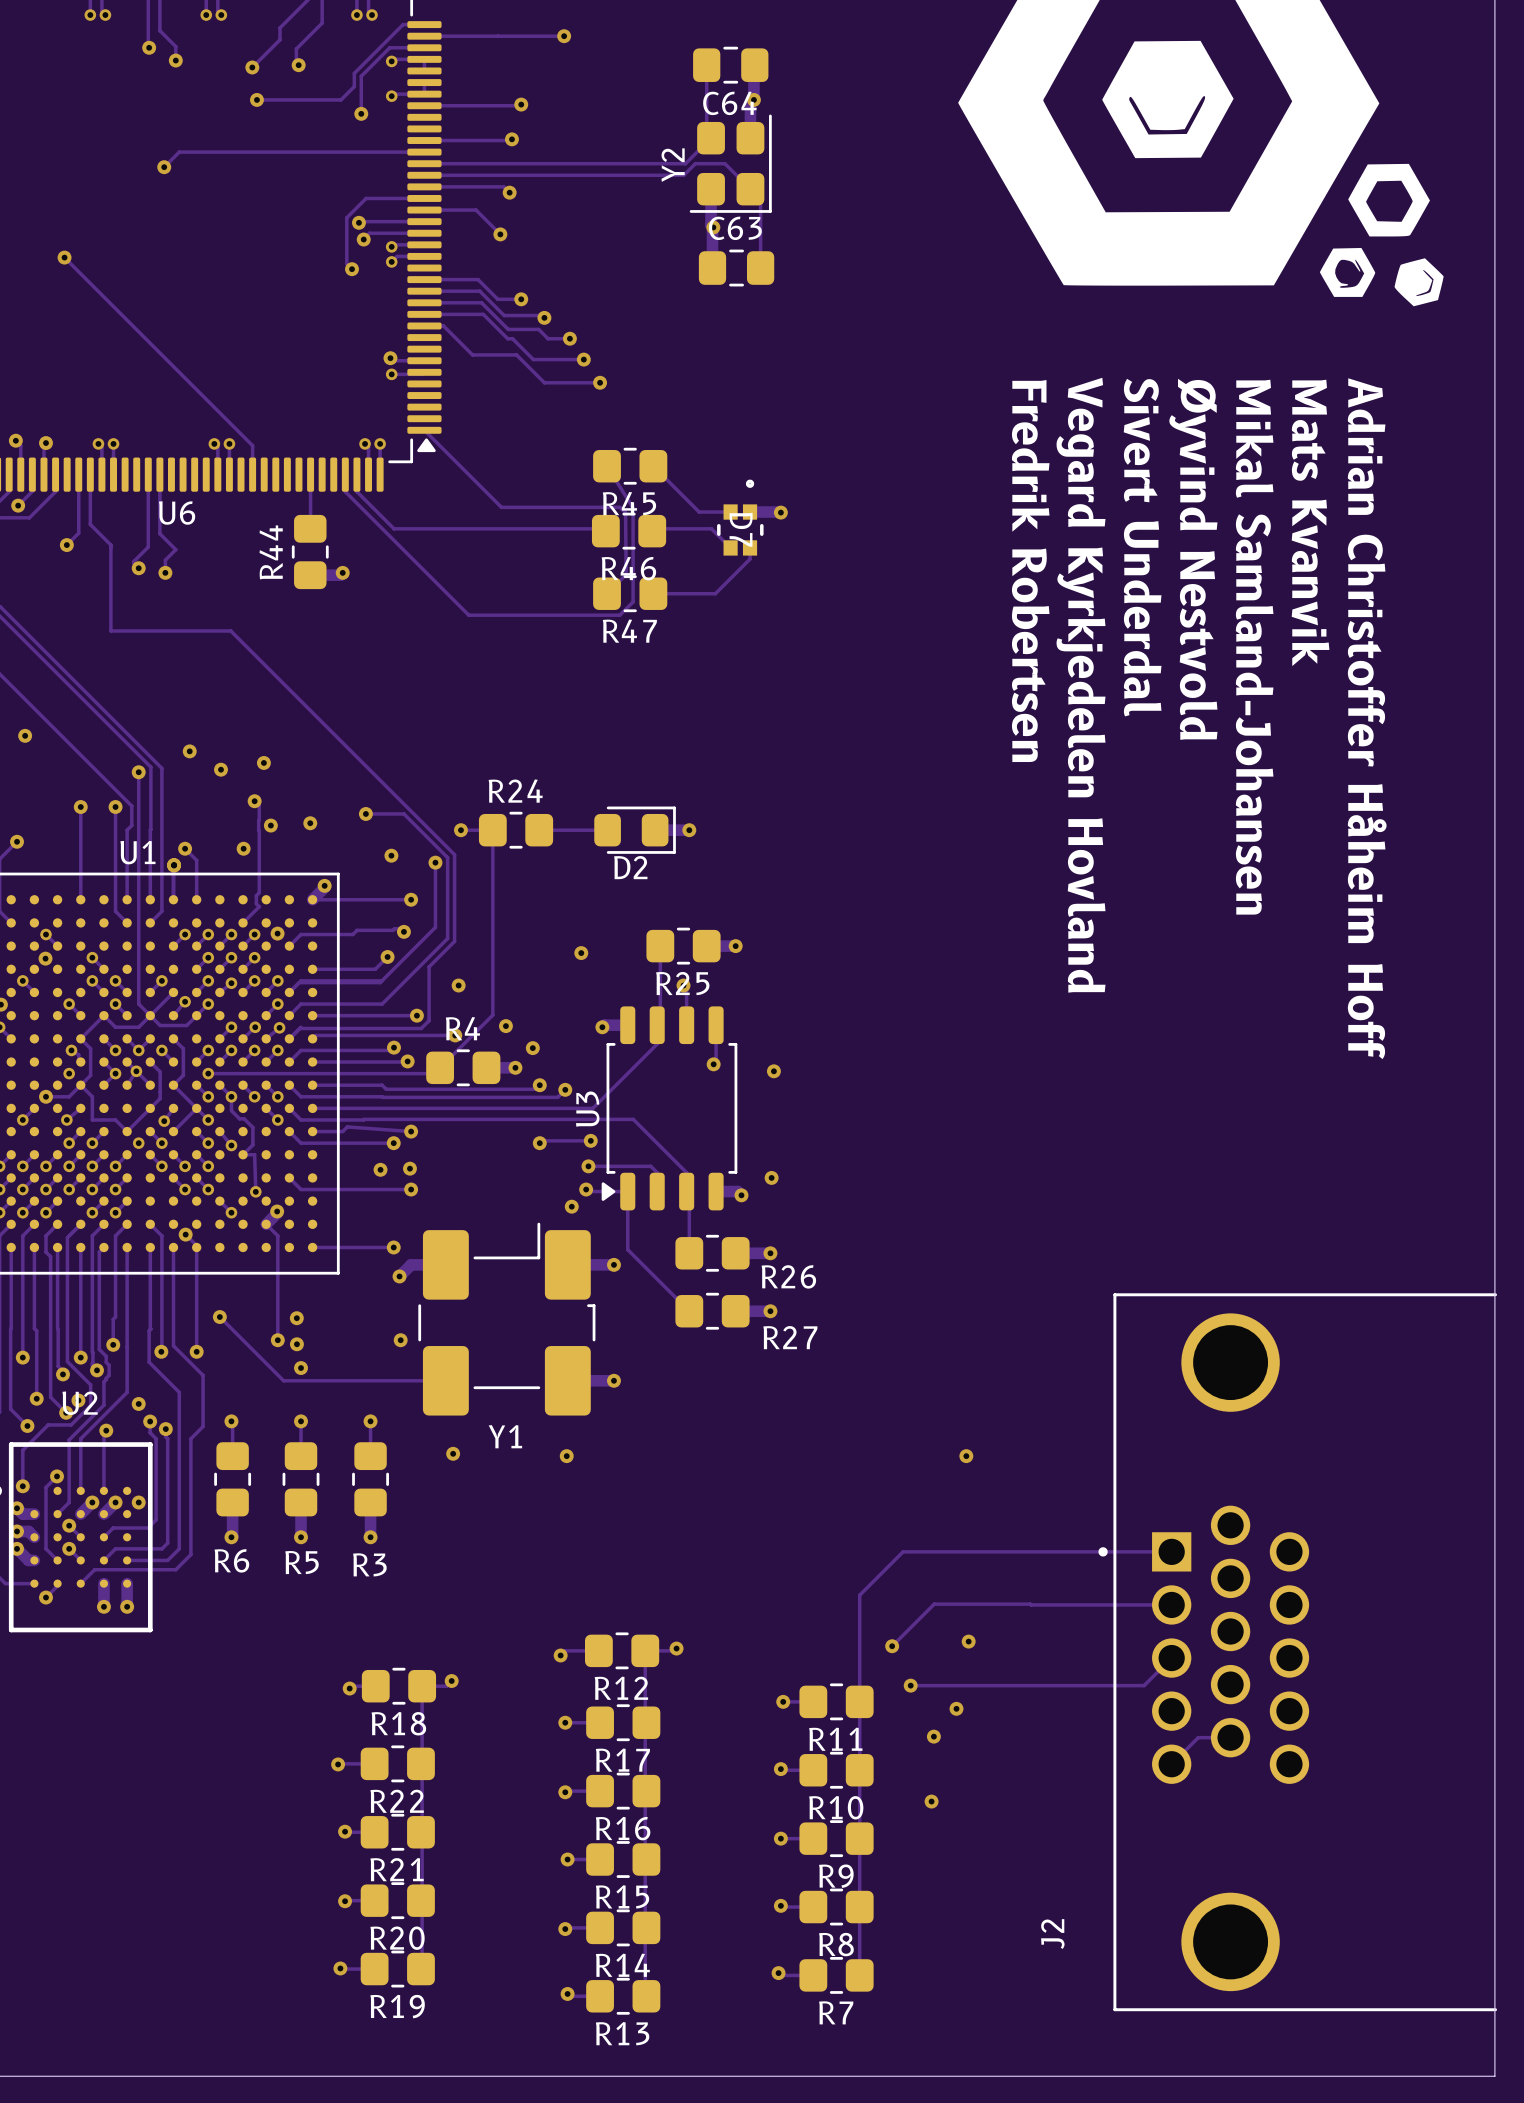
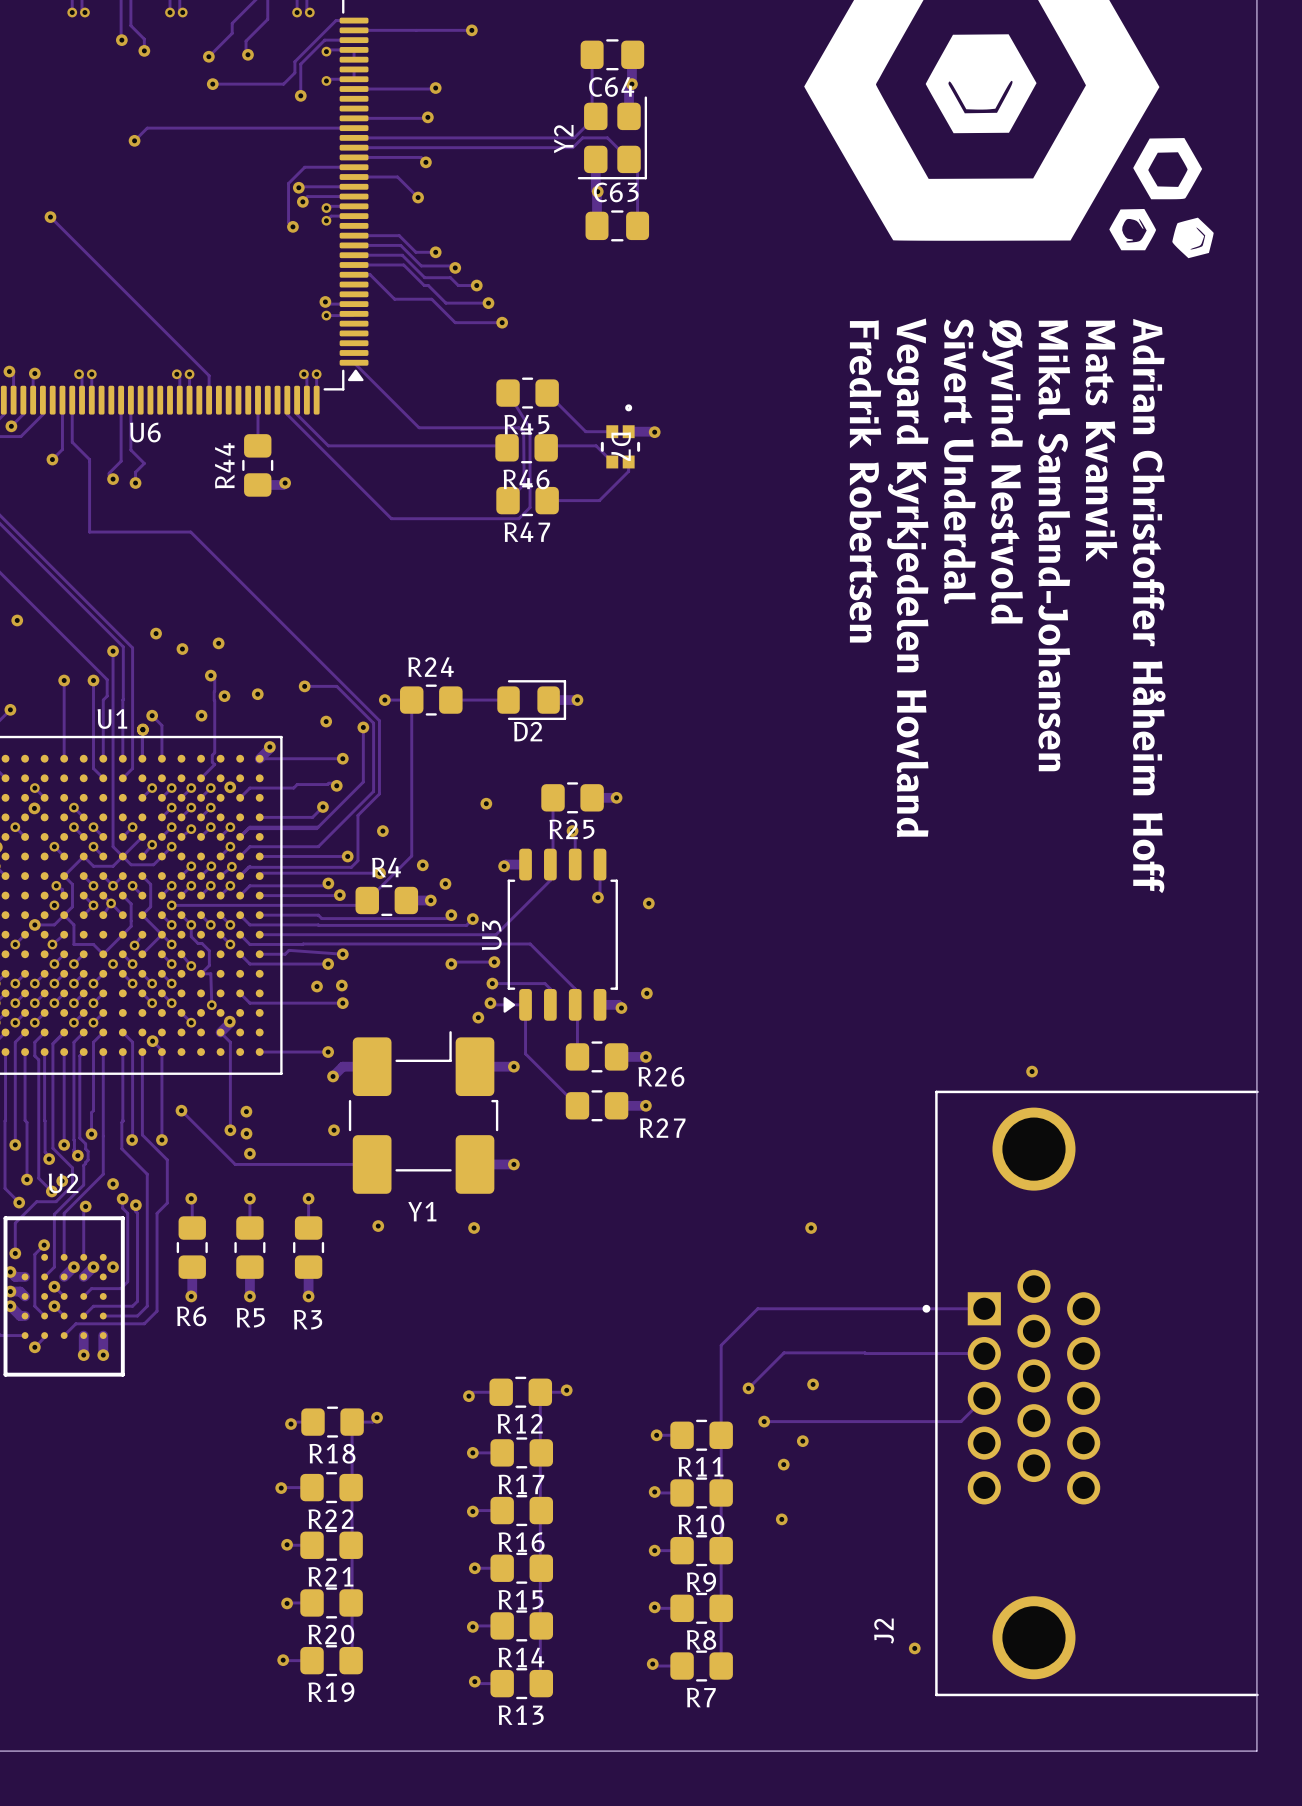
via: none -> (1032, 1071)
track: (1230, 1737) (1198, 1737) (1171, 1764) -> none
via: none -> (914, 1648)

